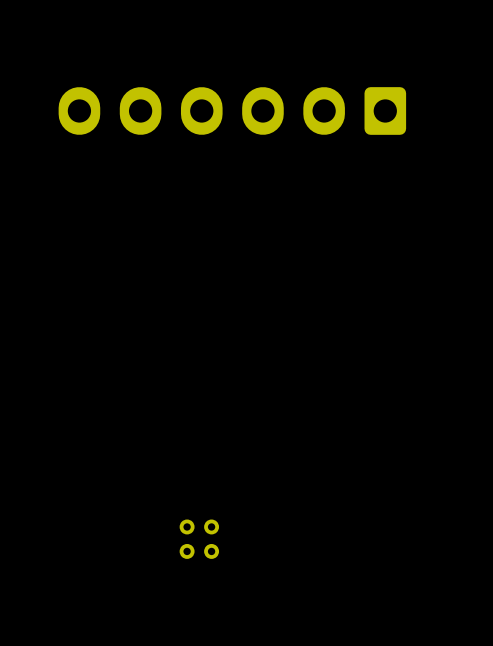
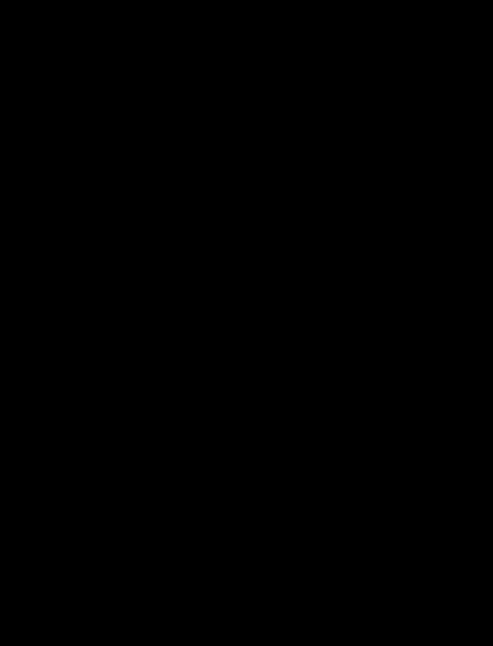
part: (232, 110) -> none
part: (199, 539) -> none

